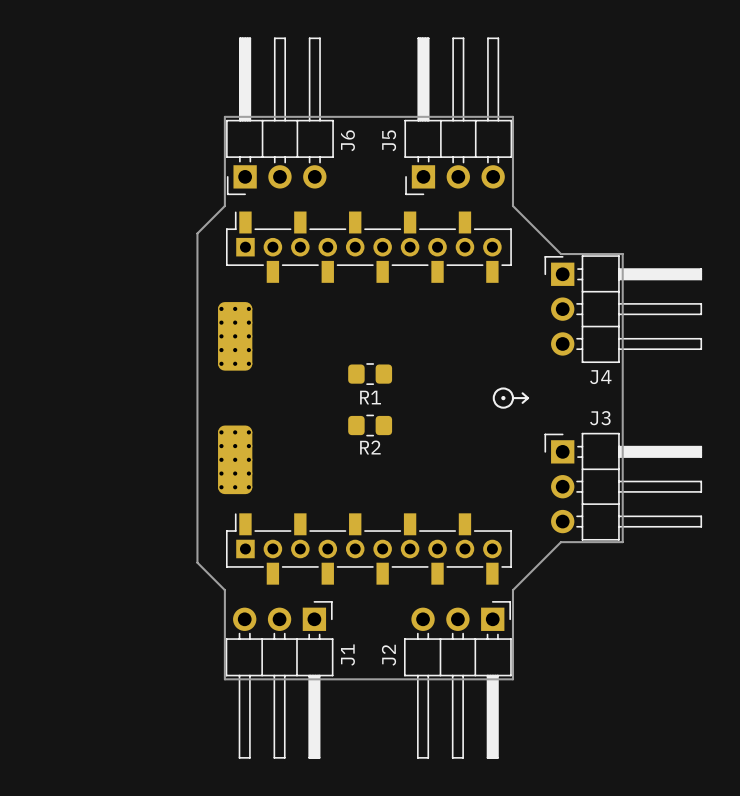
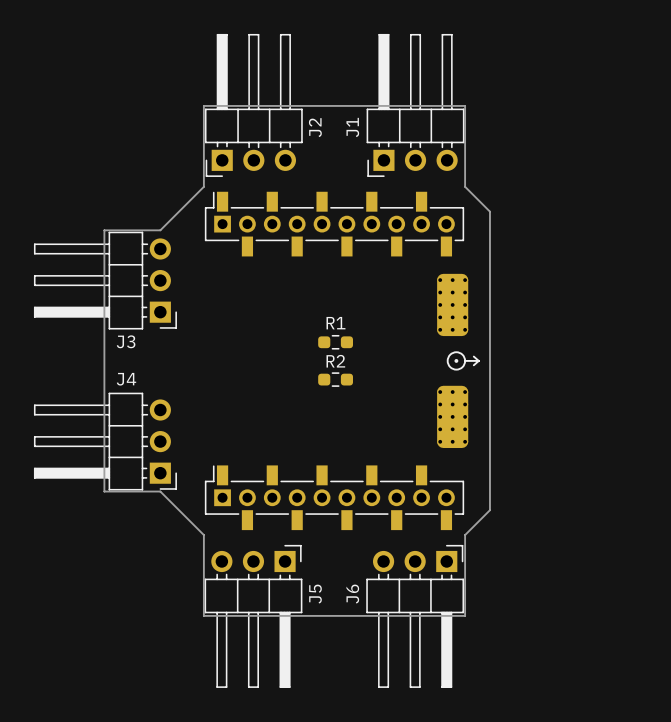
J6 name: J6 (347, 140) -> J2 (315, 127)
J5 name: J5 (389, 140) -> J1 (352, 127)
board edge: (197, 233) (197, 562) -> (179, 211) (160, 230) (104, 230) (104, 491) (160, 491) (179, 510)
board edge: (540, 233) (560, 254) (622, 254) (622, 542) (560, 542) (540, 562) -> (489, 211) (489, 510)
J4 rotation: 0° (623, 309) -> 180° (105, 441)
J4 position: (623, 309) -> (105, 441)
part: (235, 336) -> none
part: none -> (452, 304)
R1 footprint: [348, 363, 393, 385] -> [318, 335, 354, 350]
R1 name position: R1 (370, 397) -> R1 (335, 323)
R2 footprint: [348, 414, 393, 437] -> [318, 372, 354, 387]
R2 name position: R2 (370, 447) -> R2 (335, 361)
part: (235, 459) -> none
part: none -> (452, 416)
J3 rotation: 0° (623, 486) -> 180° (105, 280)
J3 position: (623, 486) -> (105, 280)
J1 name: J1 (347, 655) -> J5 (315, 594)
J2 name: J2 (389, 655) -> J6 (352, 594)

